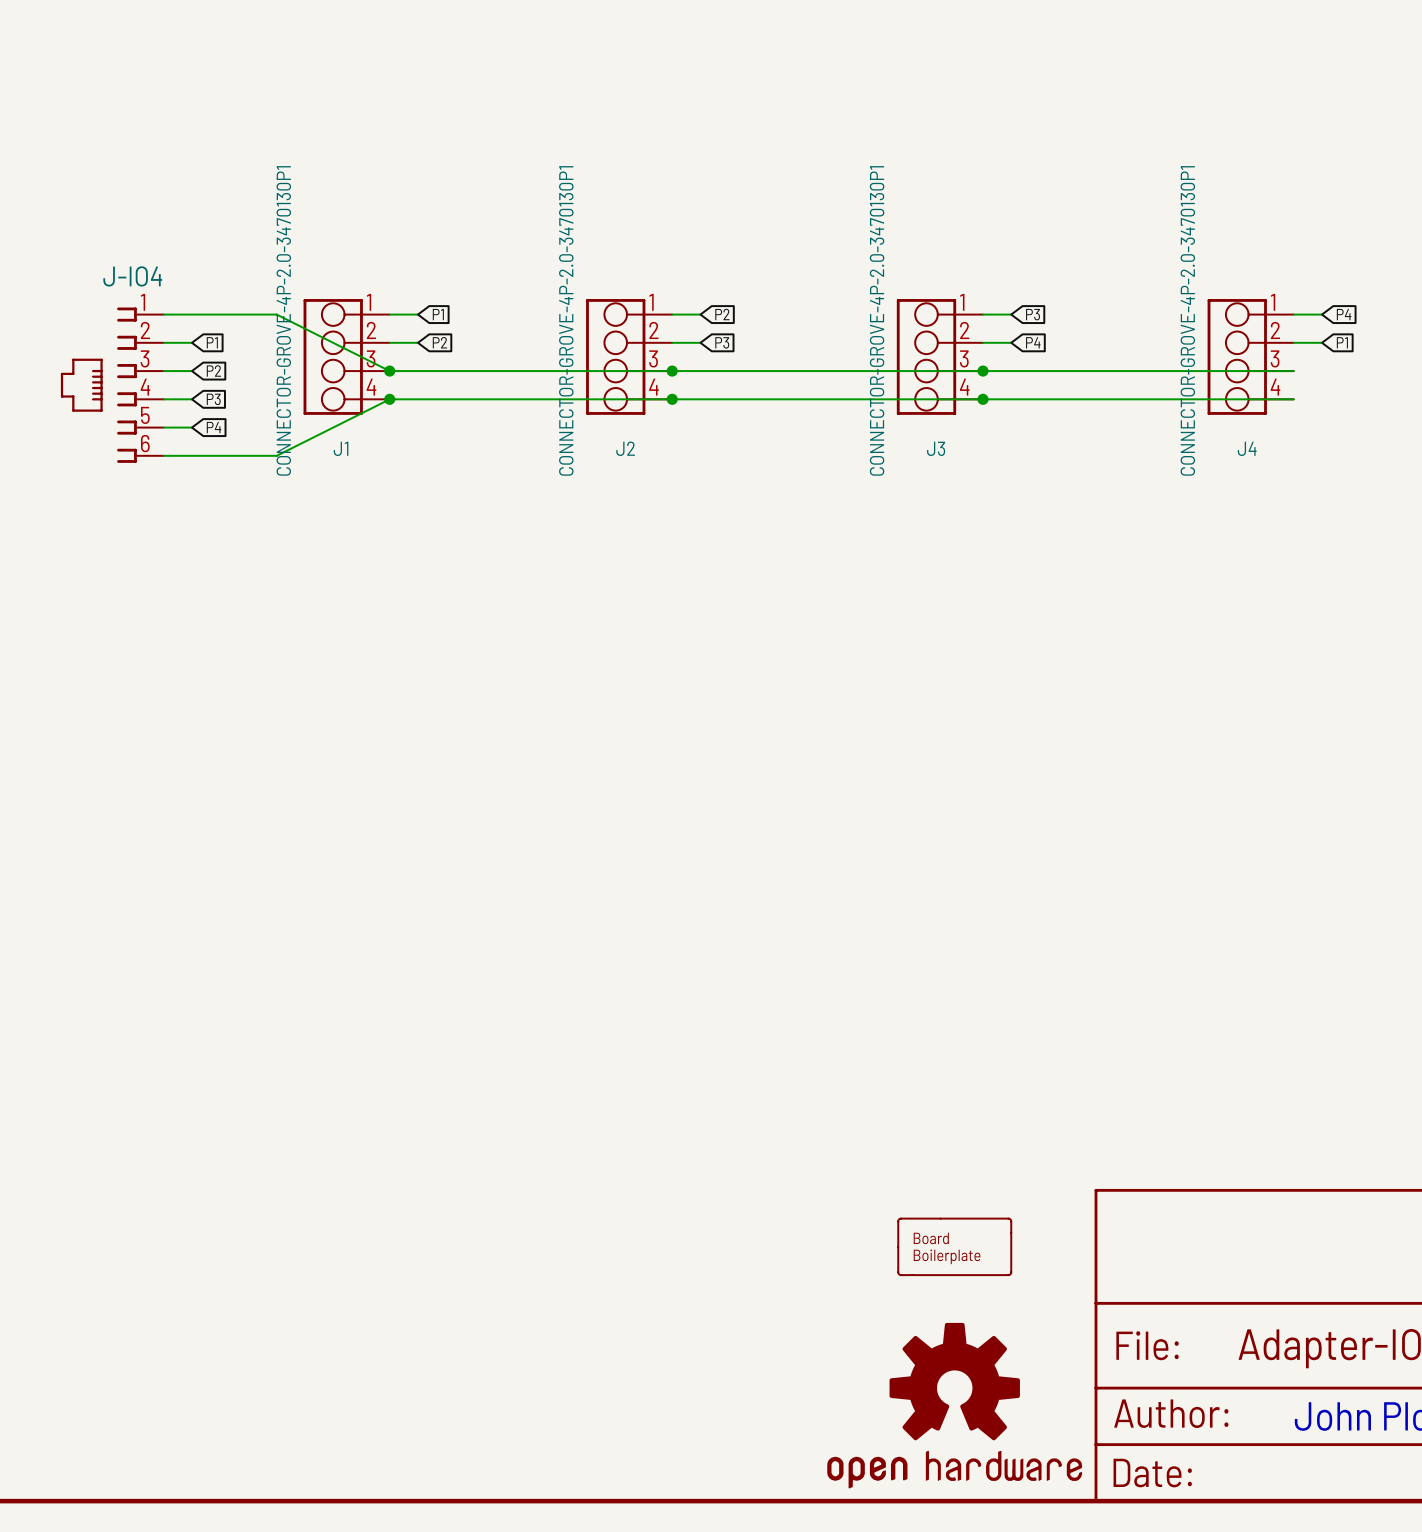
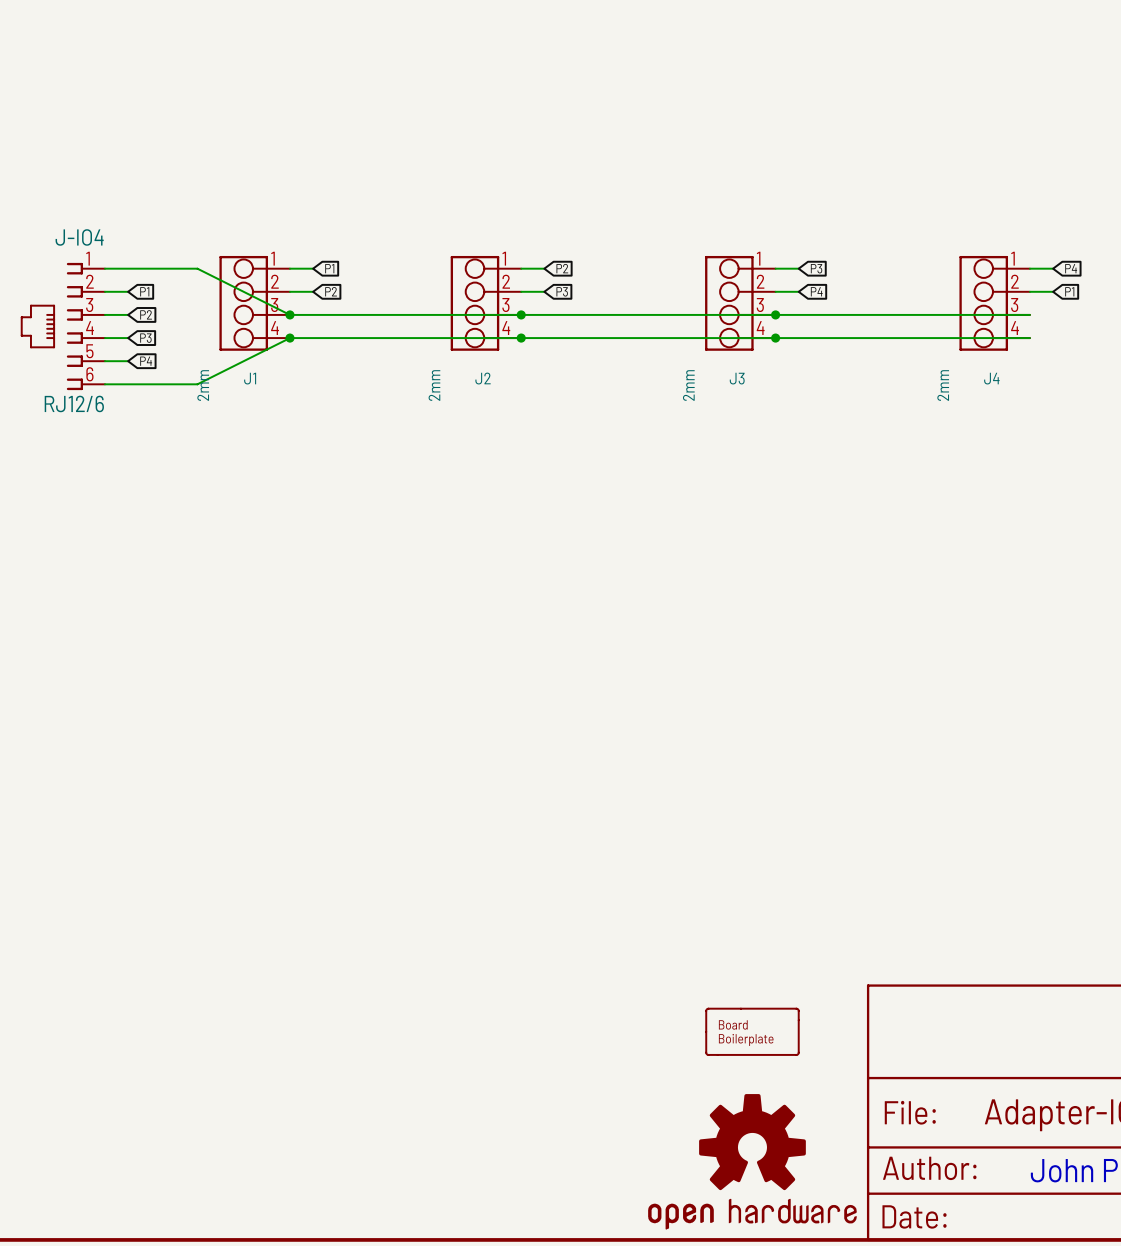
J1 value: CONNECTOR-GROVE-4P-2.0-3470130P1 (283, 320) -> 2mm (203, 385)
J2 value: CONNECTOR-GROVE-4P-2.0-3470130P1 (566, 320) -> 2mm (434, 385)
J3 value: CONNECTOR-GROVE-4P-2.0-3470130P1 (877, 320) -> 2mm (688, 385)
J4 value: CONNECTOR-GROVE-4P-2.0-3470130P1 (1187, 320) -> 2mm (943, 385)
J-IO4 value: none -> RJ12/6 (74, 403)

